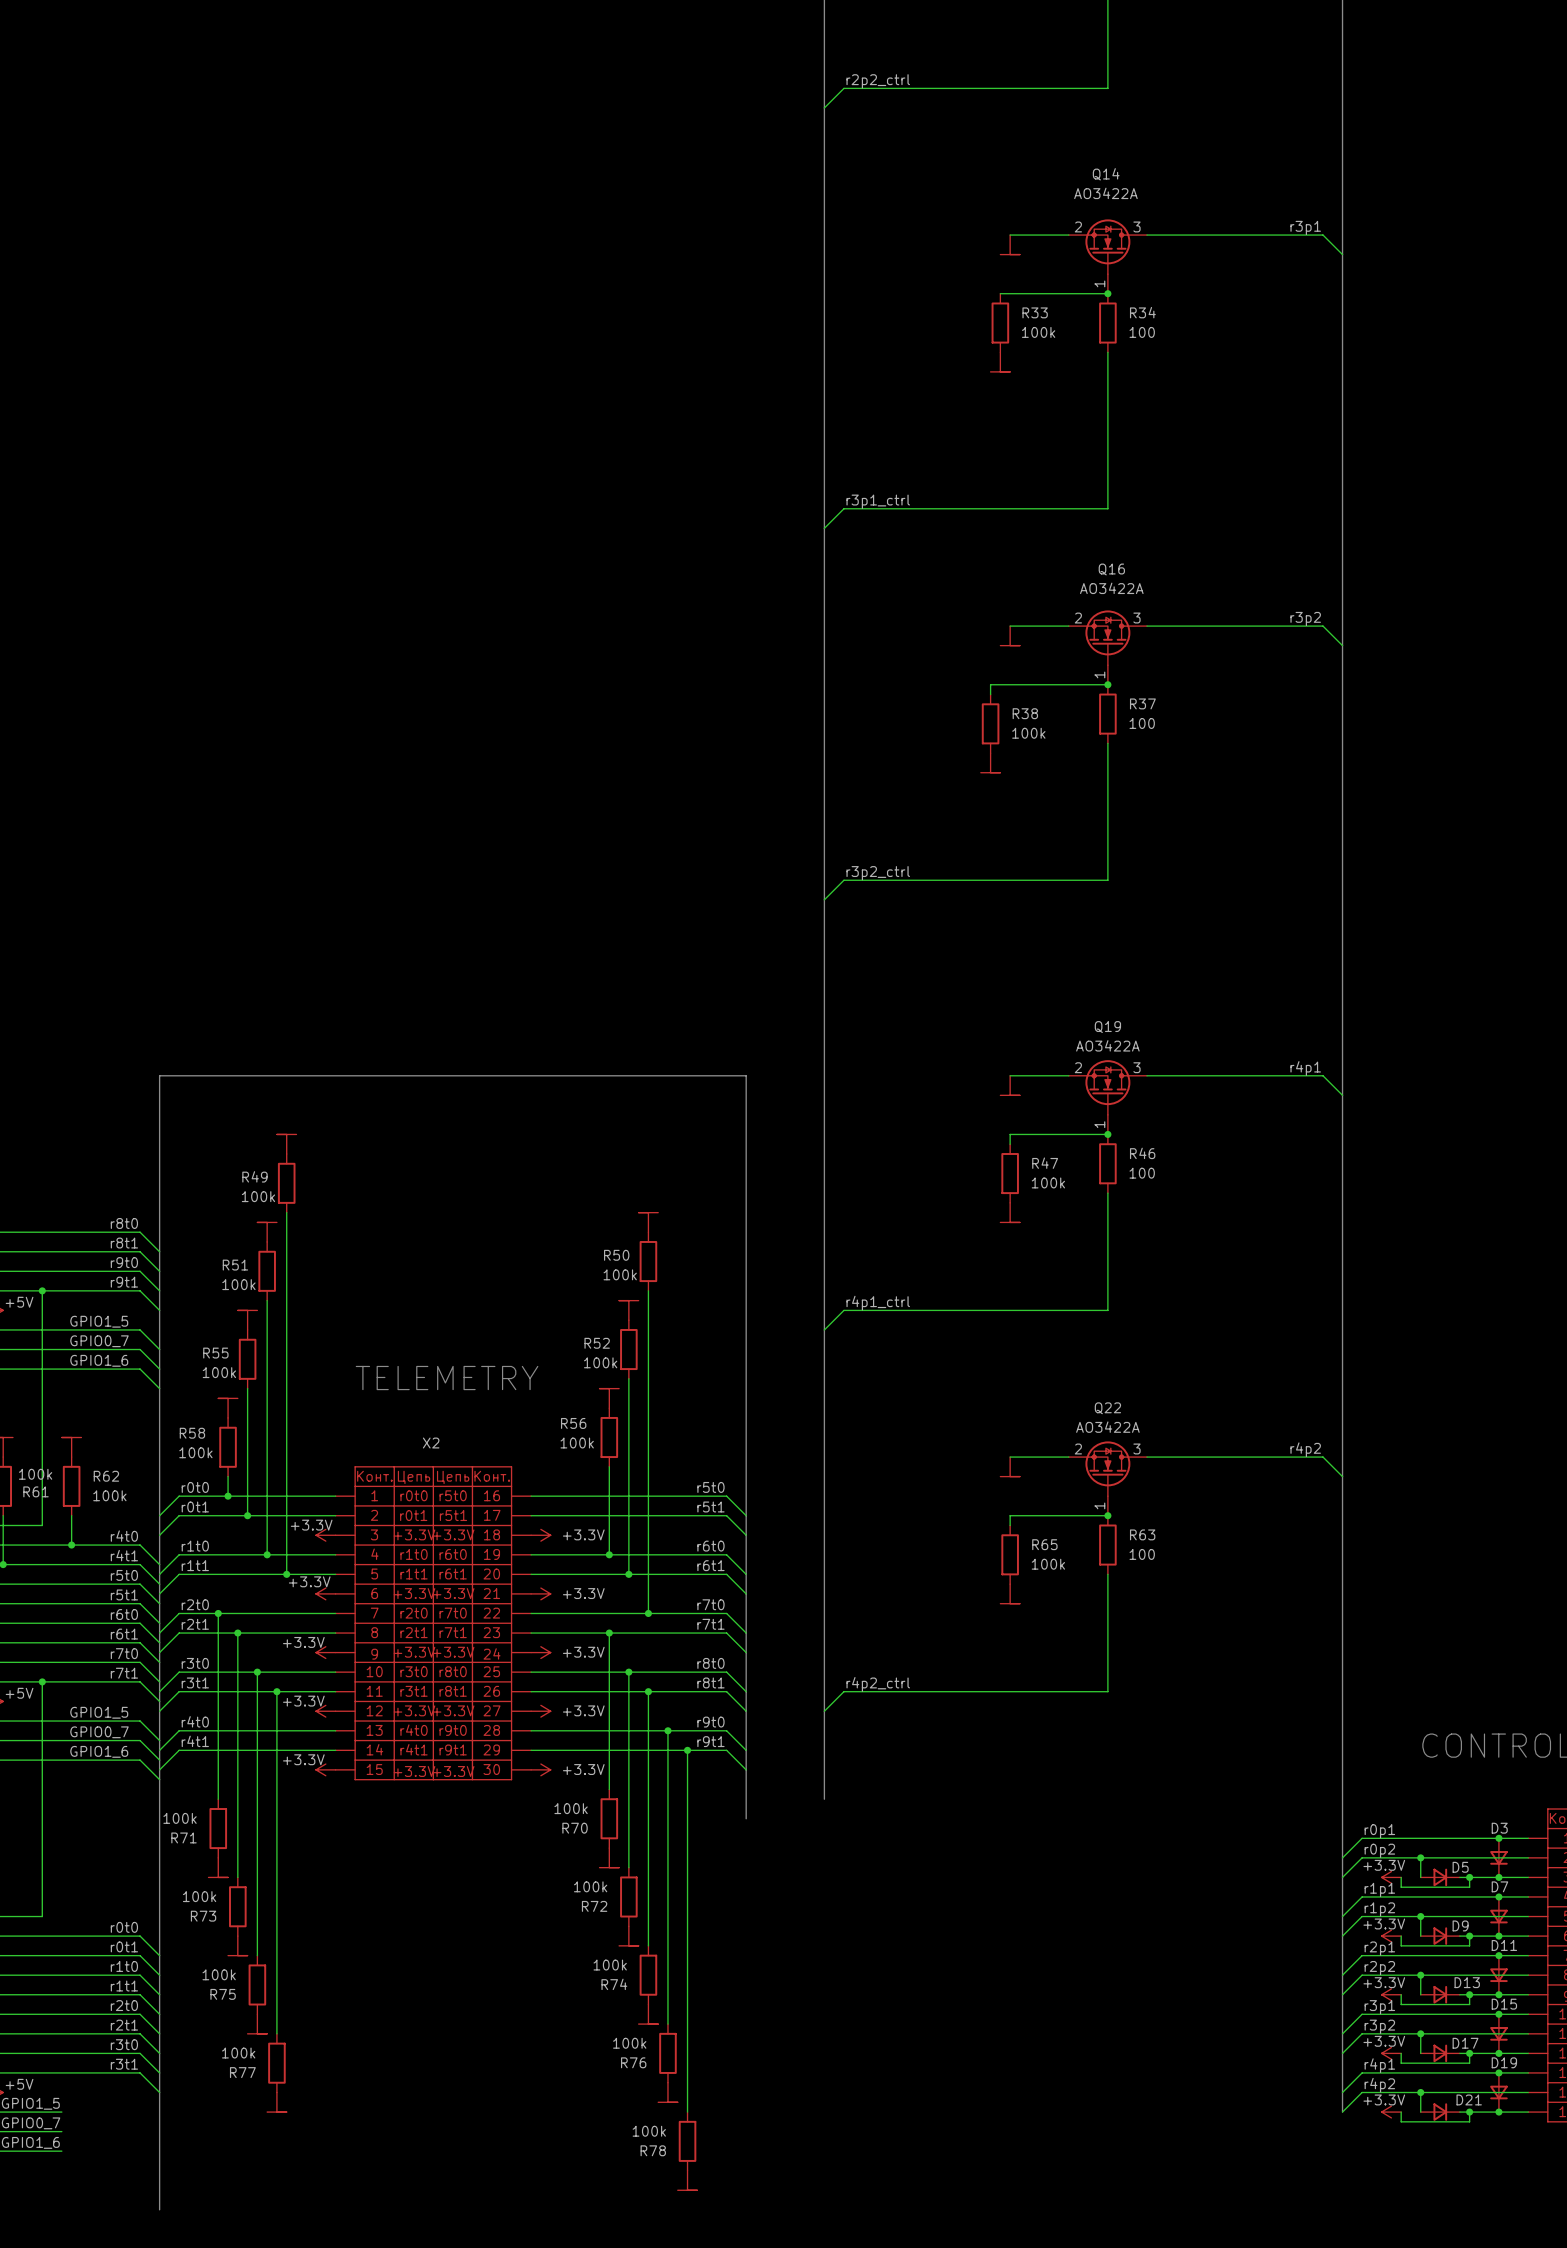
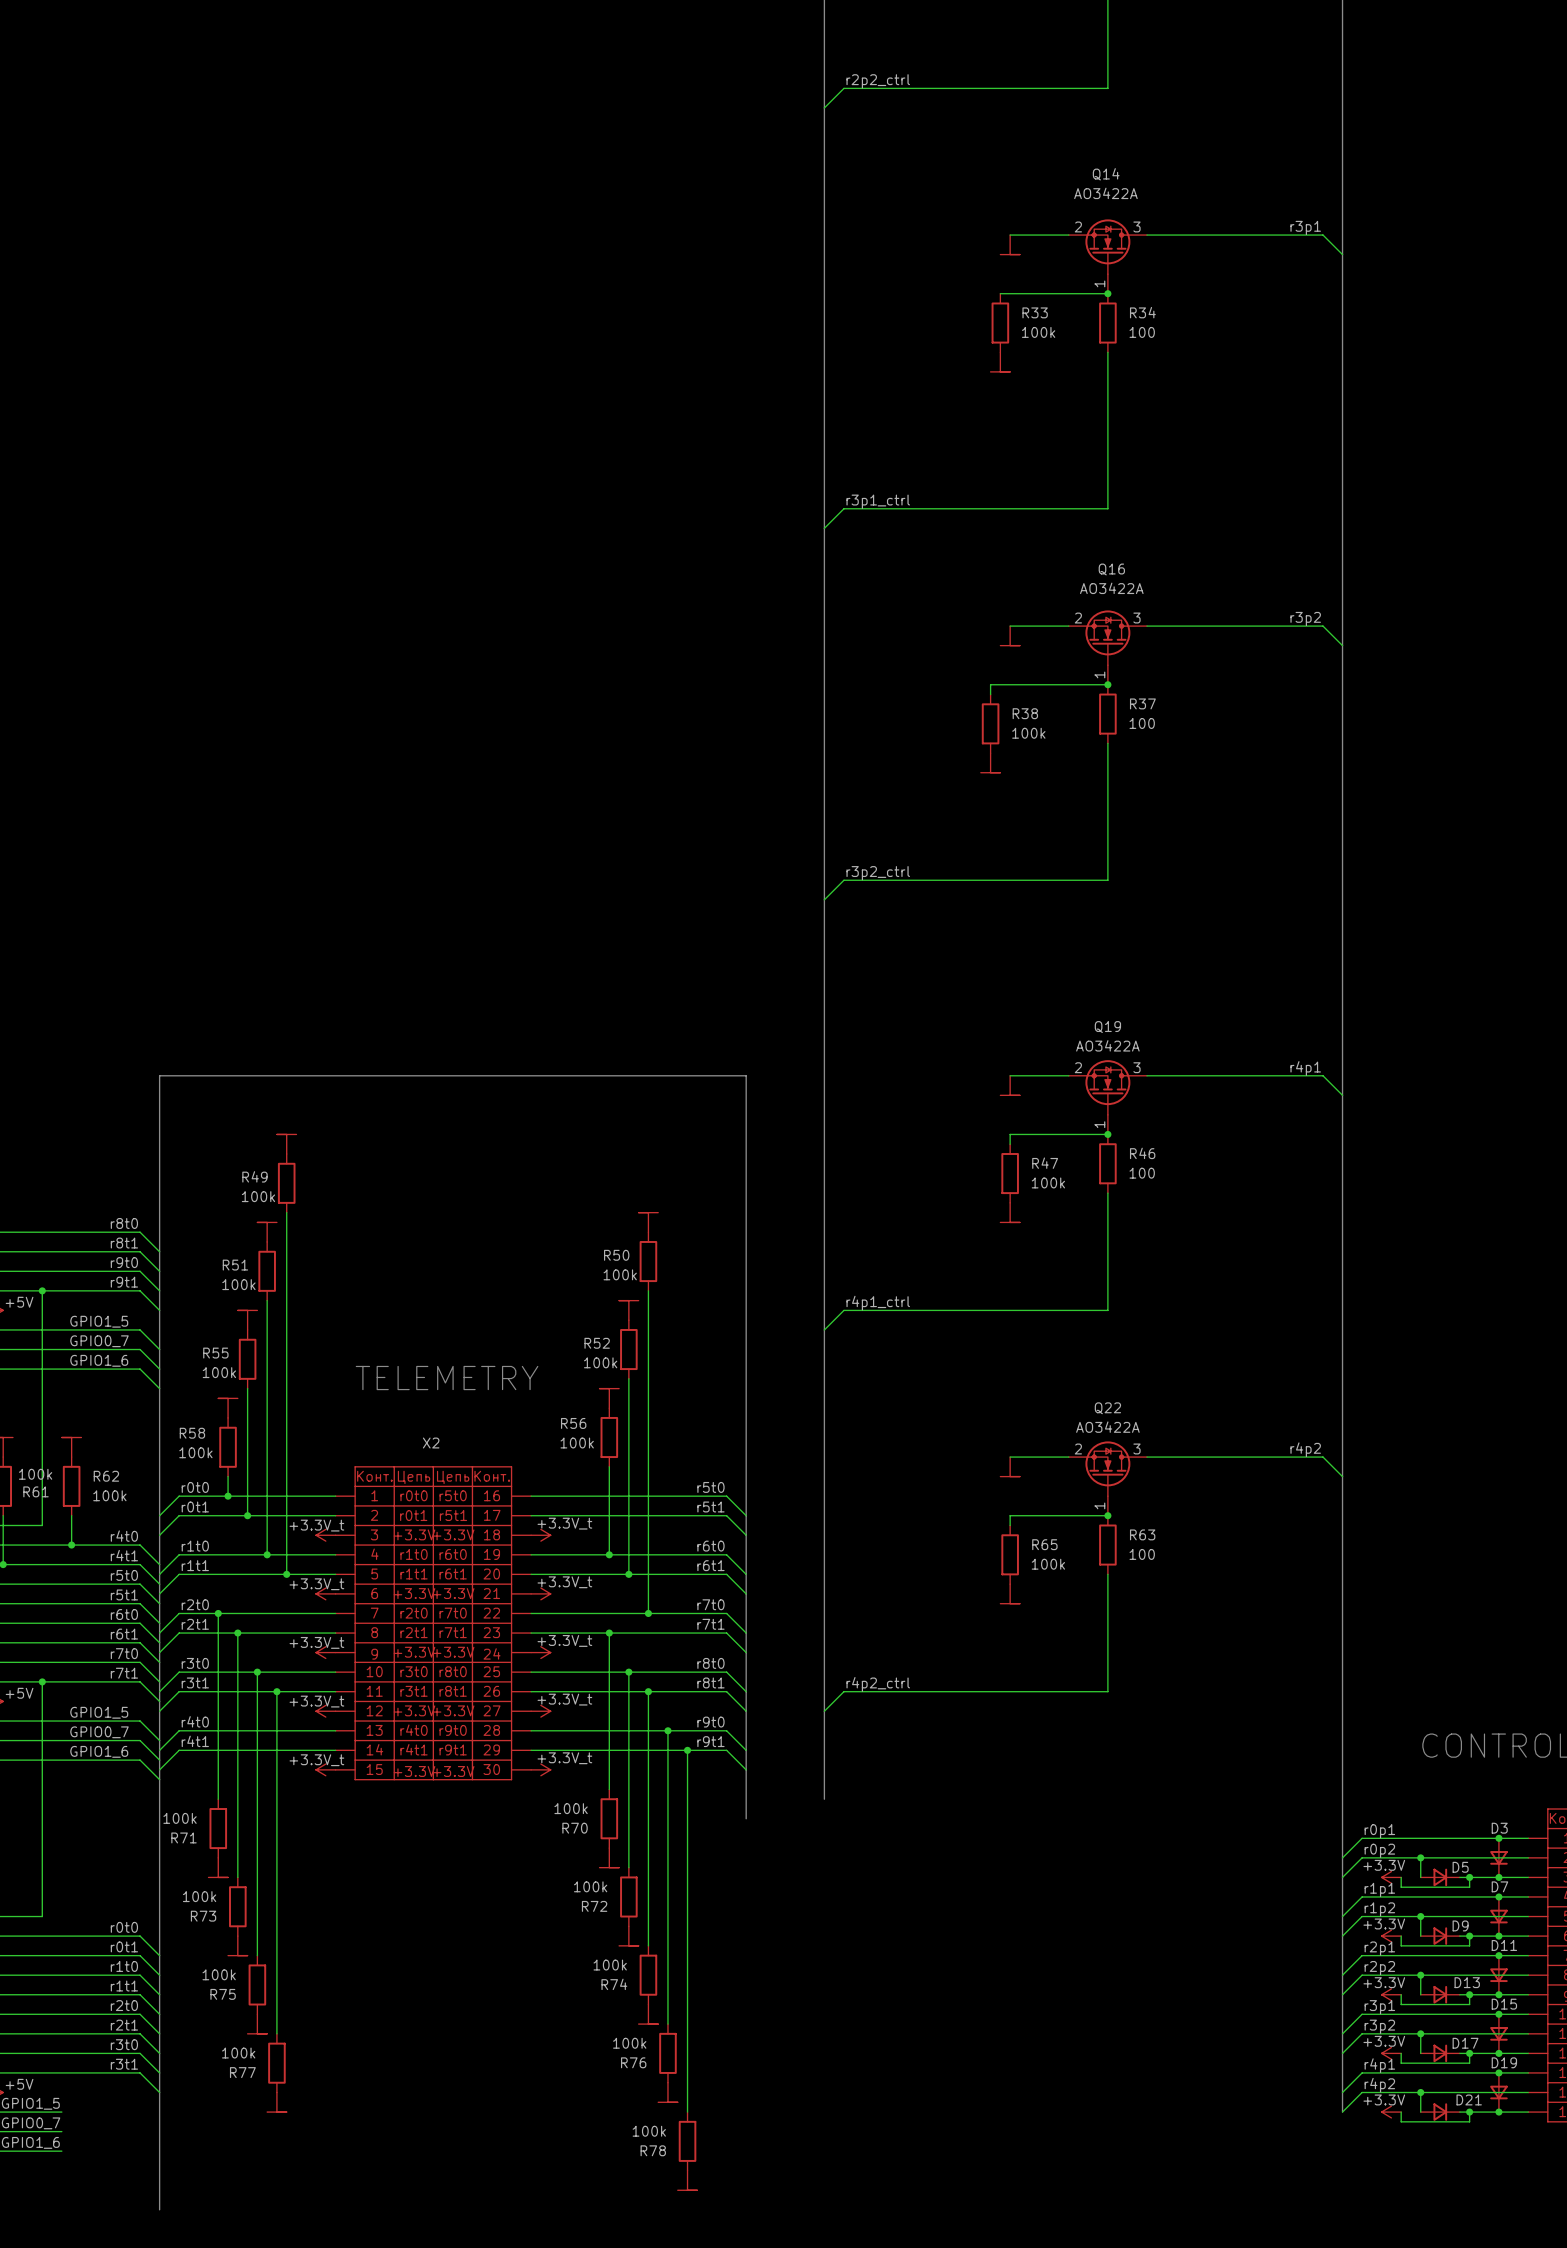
power symbol: +3.3V (325, 1535) -> +3.3V_t (325, 1535)
power symbol: +3.3V (540, 1535) -> +3.3V_t (540, 1535)
power symbol: +3.3V (325, 1593) -> +3.3V_t (325, 1593)
power symbol: +3.3V (540, 1593) -> +3.3V_t (540, 1593)
power symbol: +3.3V (325, 1652) -> +3.3V_t (325, 1652)
power symbol: +3.3V (540, 1652) -> +3.3V_t (540, 1652)
power symbol: +3.3V (325, 1711) -> +3.3V_t (325, 1711)
power symbol: +3.3V (540, 1711) -> +3.3V_t (540, 1711)
power symbol: +3.3V (325, 1769) -> +3.3V_t (325, 1769)
power symbol: +3.3V (540, 1769) -> +3.3V_t (540, 1769)

